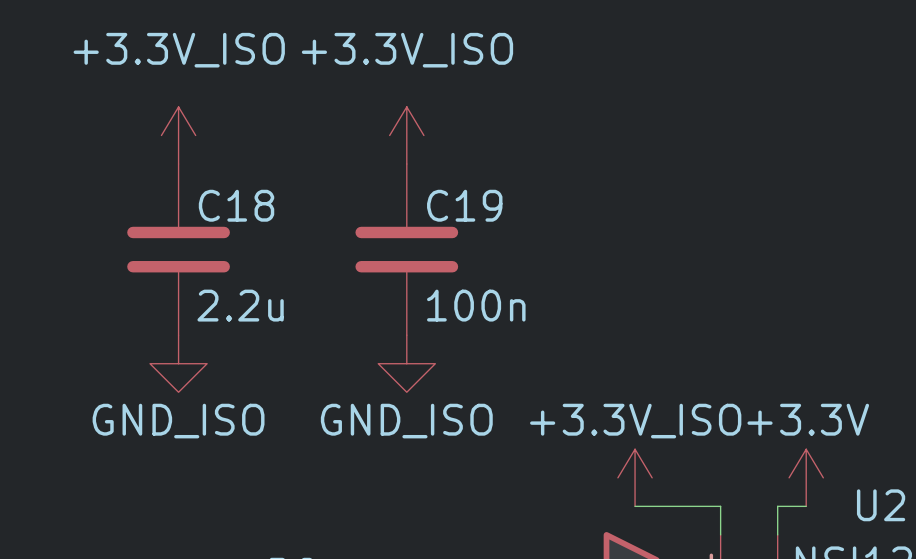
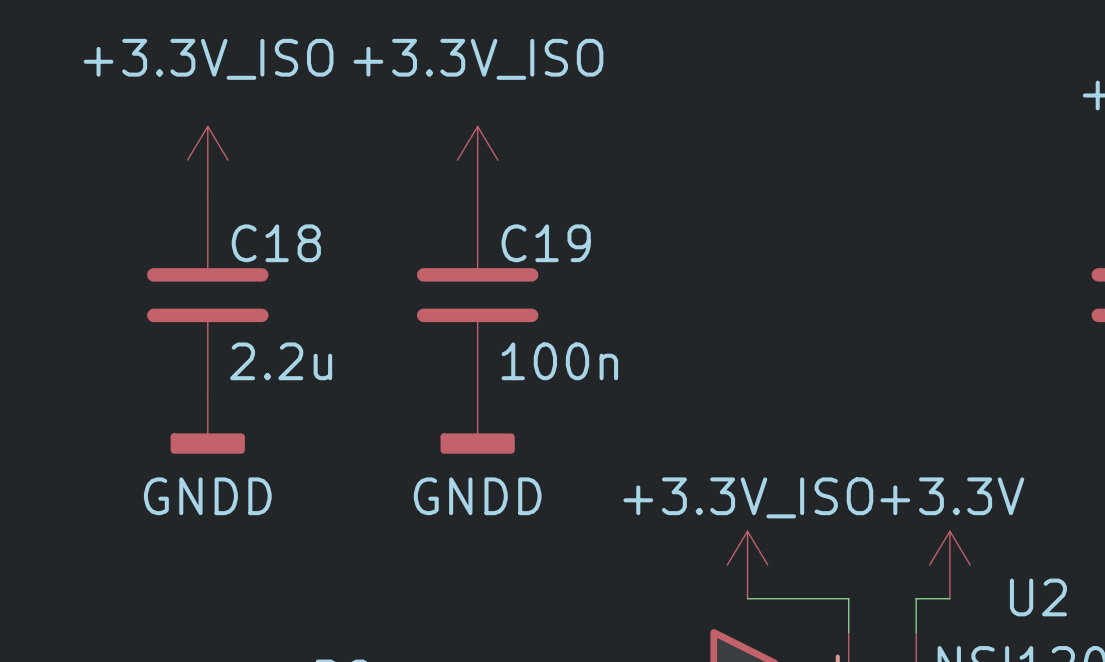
power symbol: GND_ISO (178, 363) -> GNDD (207, 425)
power symbol: GND_ISO (406, 363) -> GNDD (477, 425)

